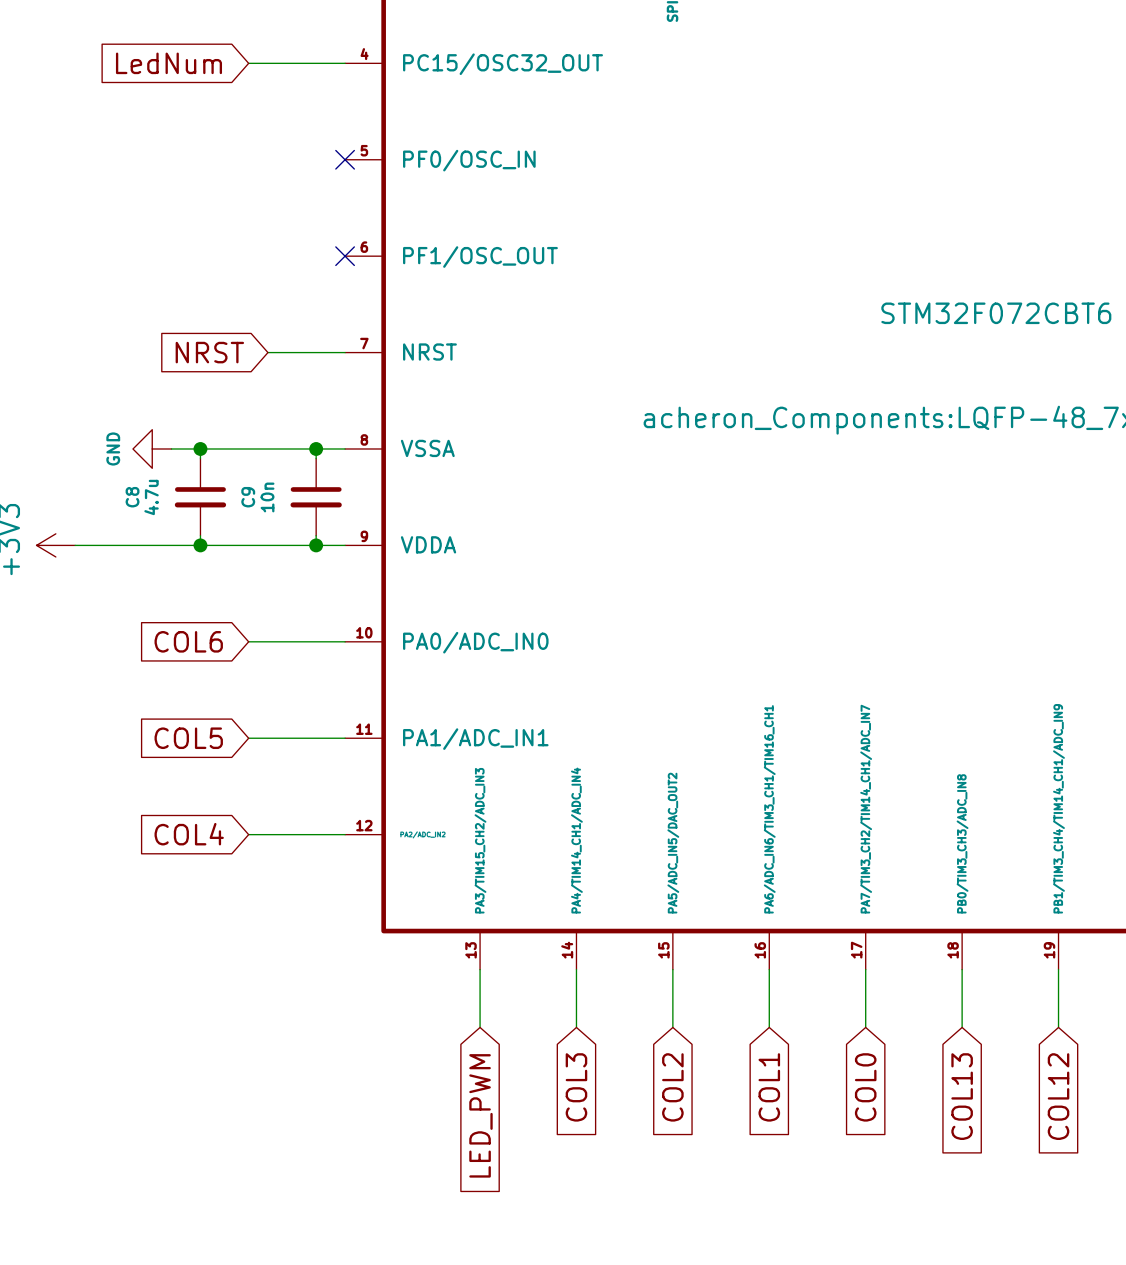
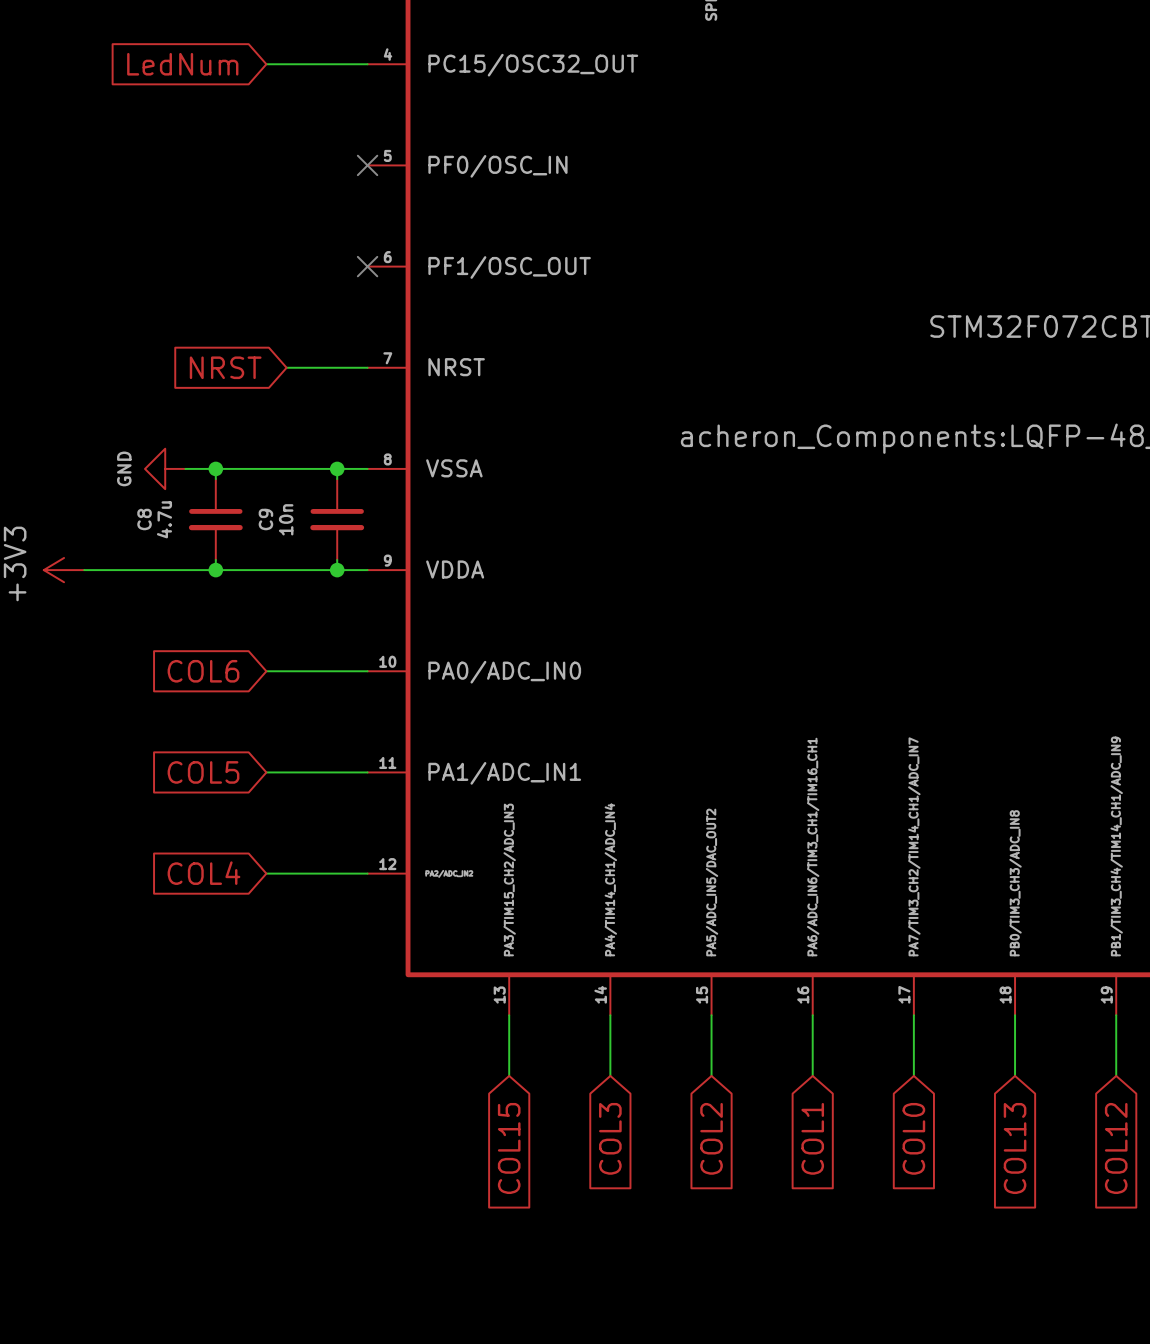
global label: LED_PWM (480, 1115) -> COL15 (509, 1148)

